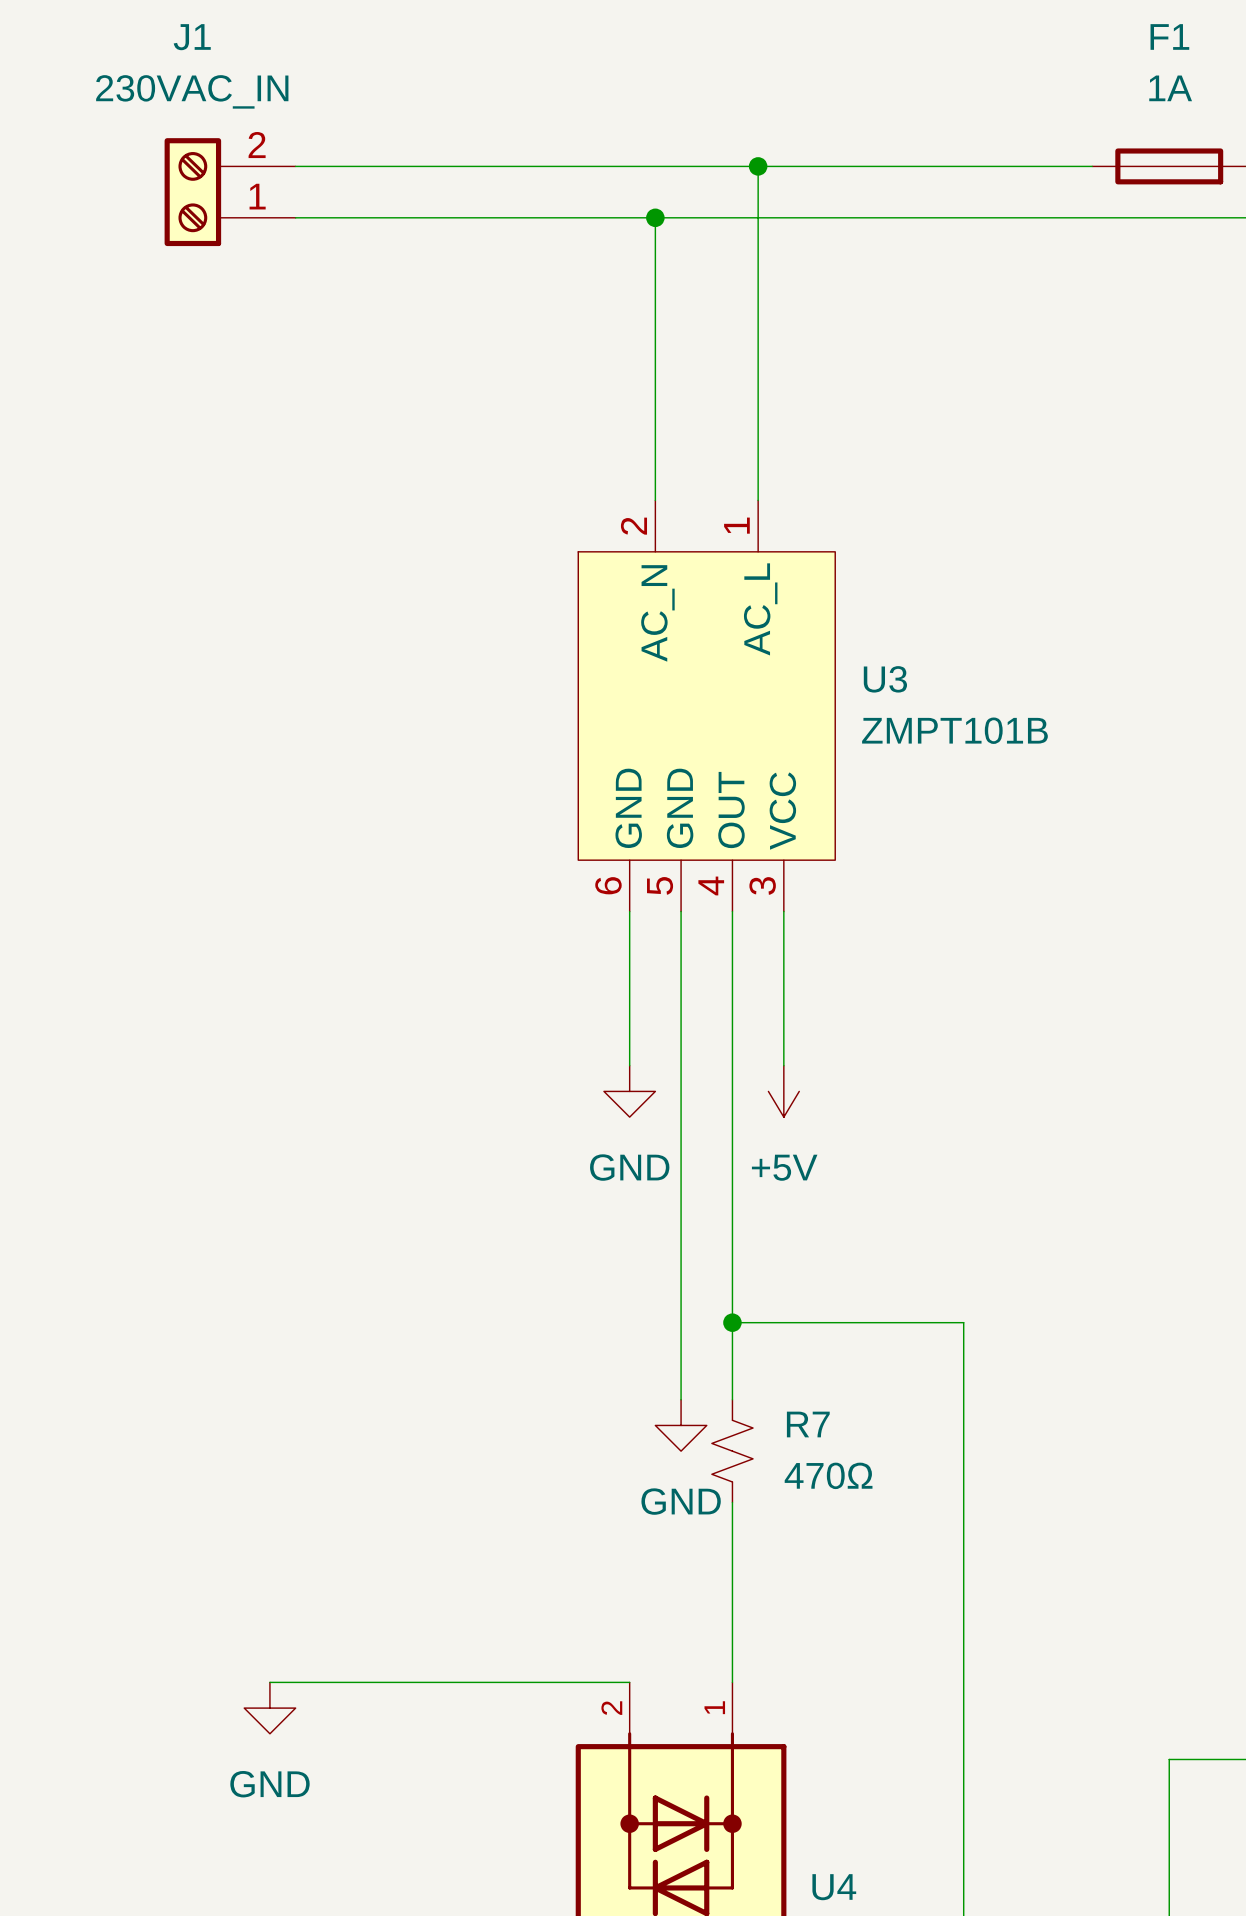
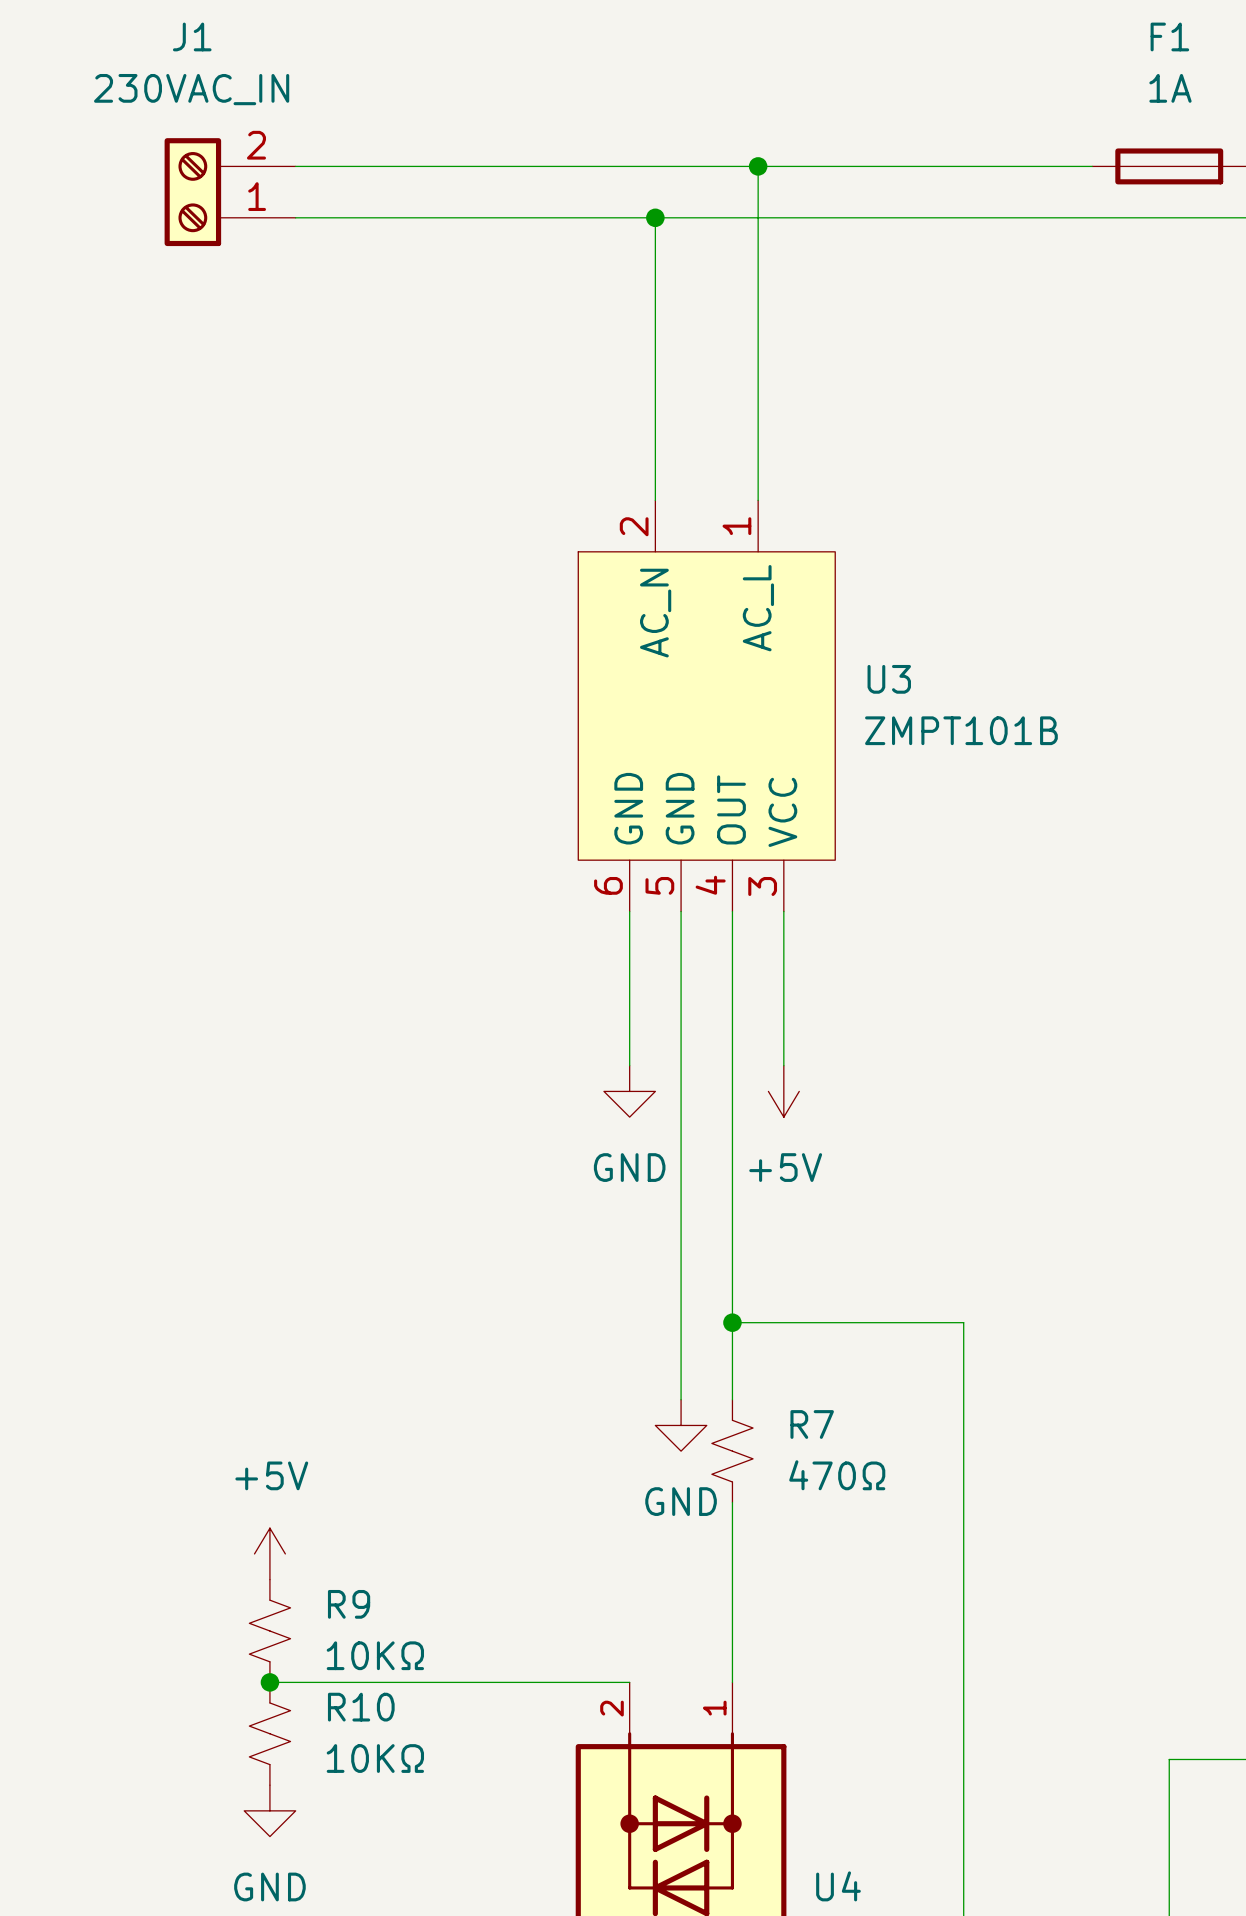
power symbol: none -> +5V (269, 1553)
R9: none -> 10KΩ (269, 1631)
junction: none -> (269, 1682)
power symbol position: GND (269, 1708) -> GND (269, 1810)
R10: none -> 10KΩ (269, 1733)

